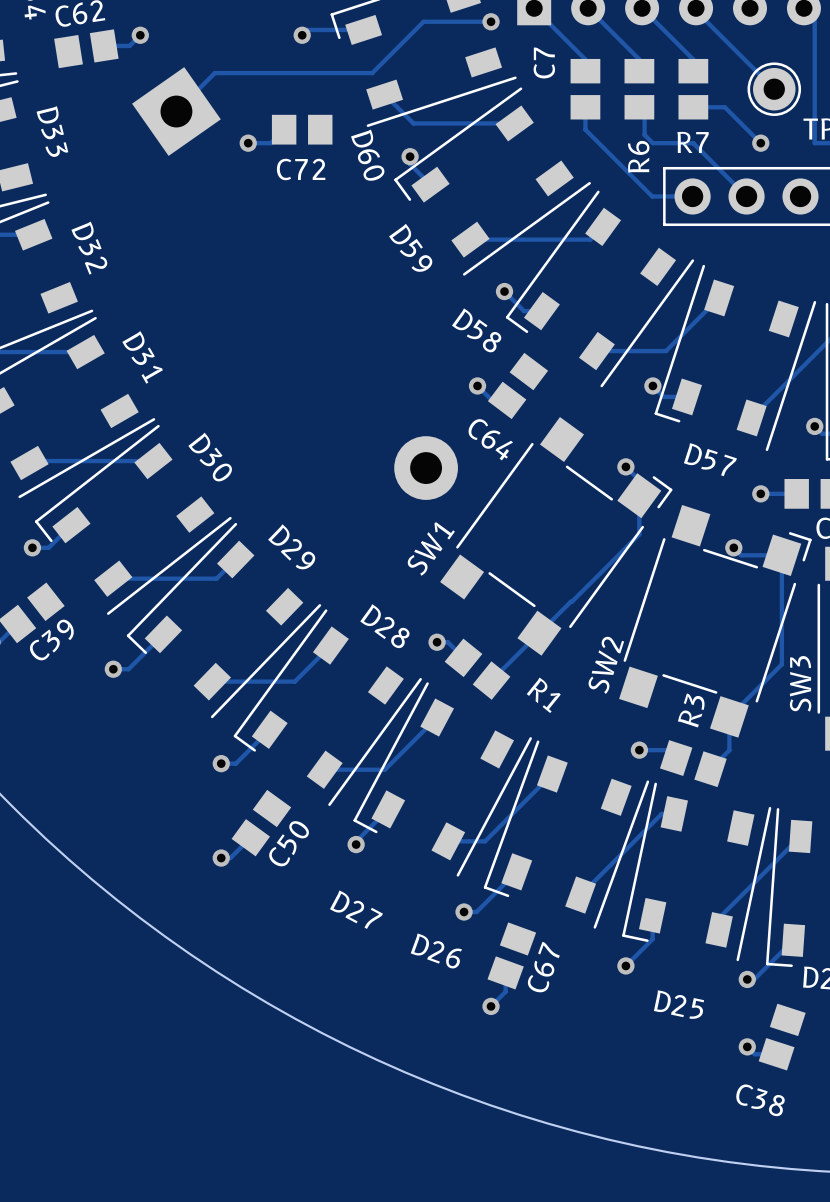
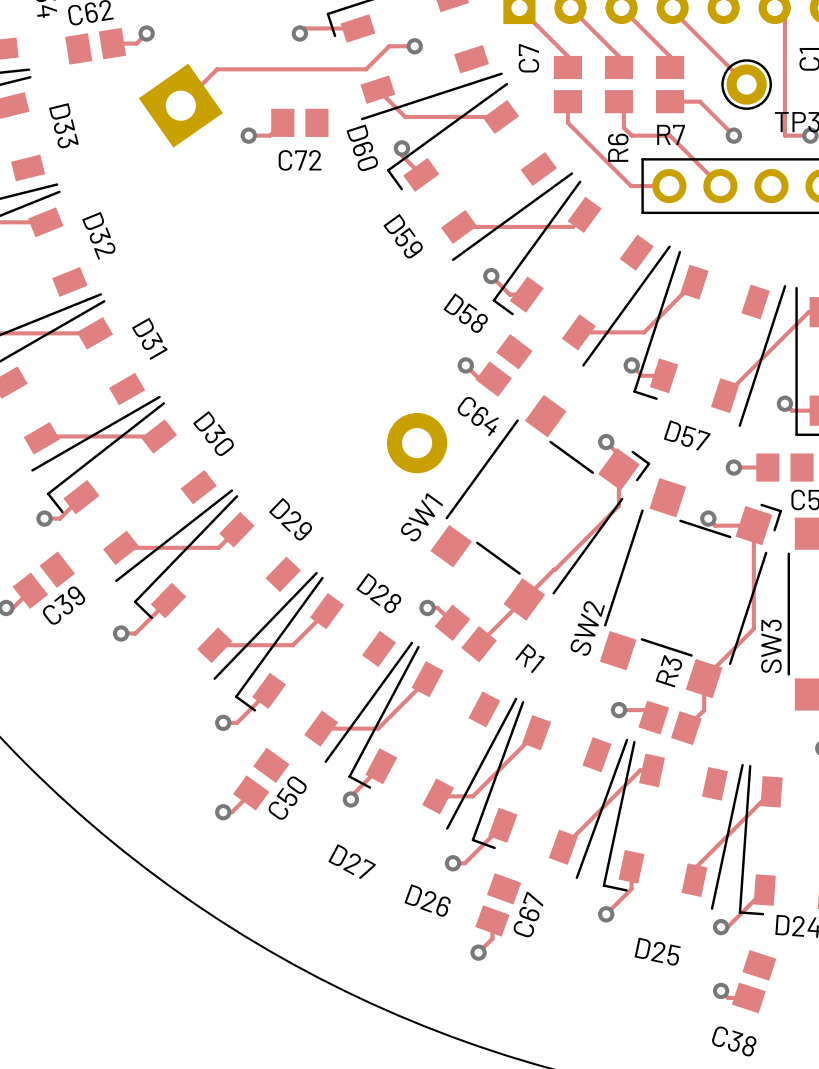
track: (491, 21) (423, 21) (396, 48) -> (414, 46) (389, 46)
via position: (491, 21) -> (414, 46)

